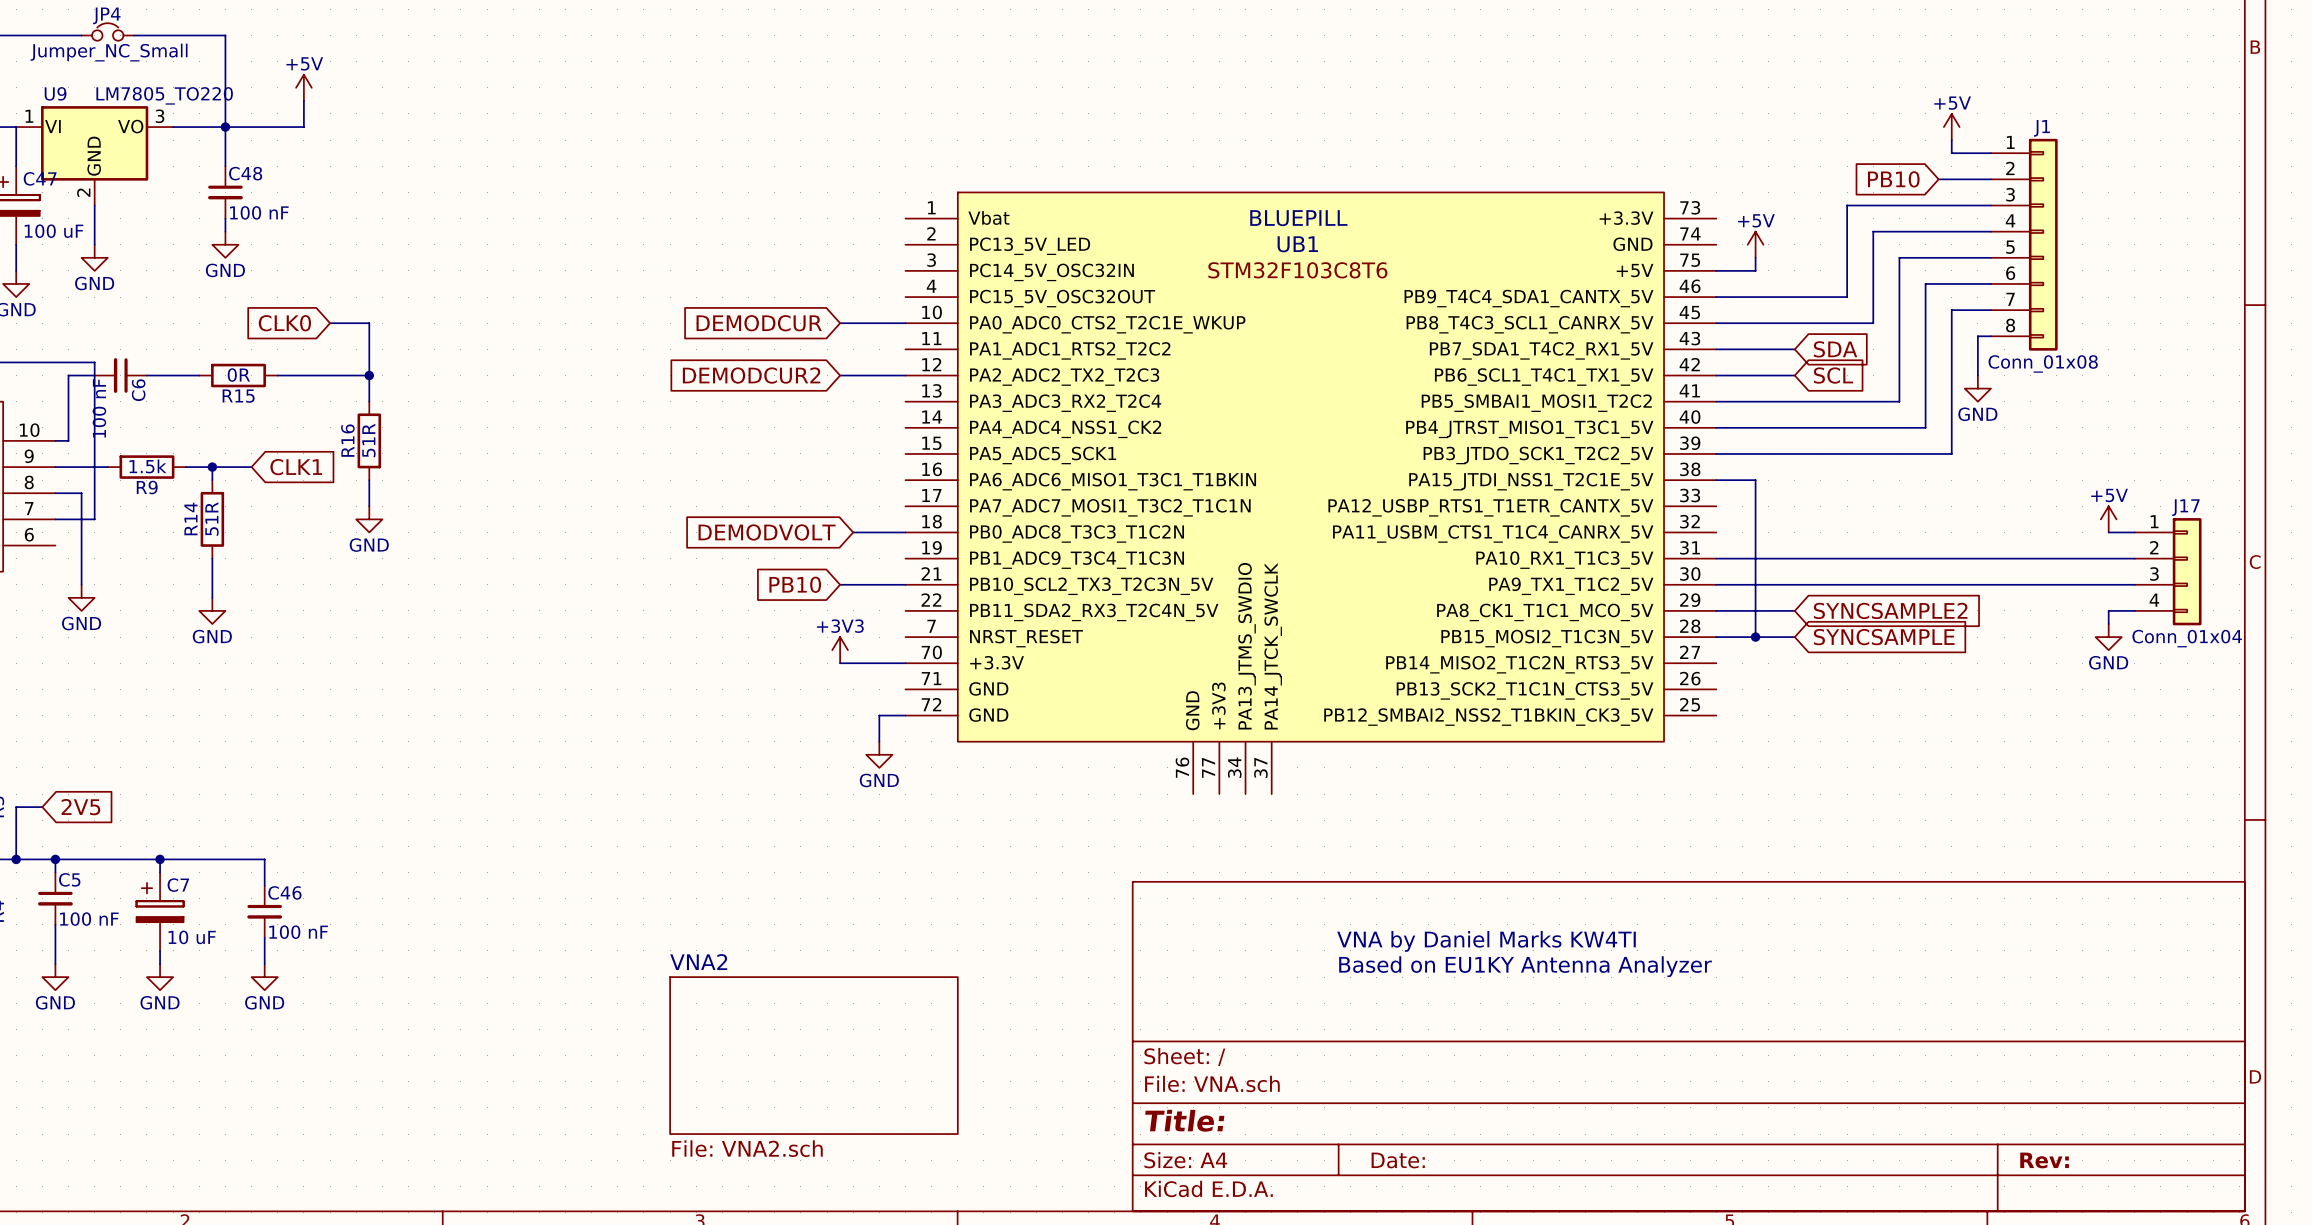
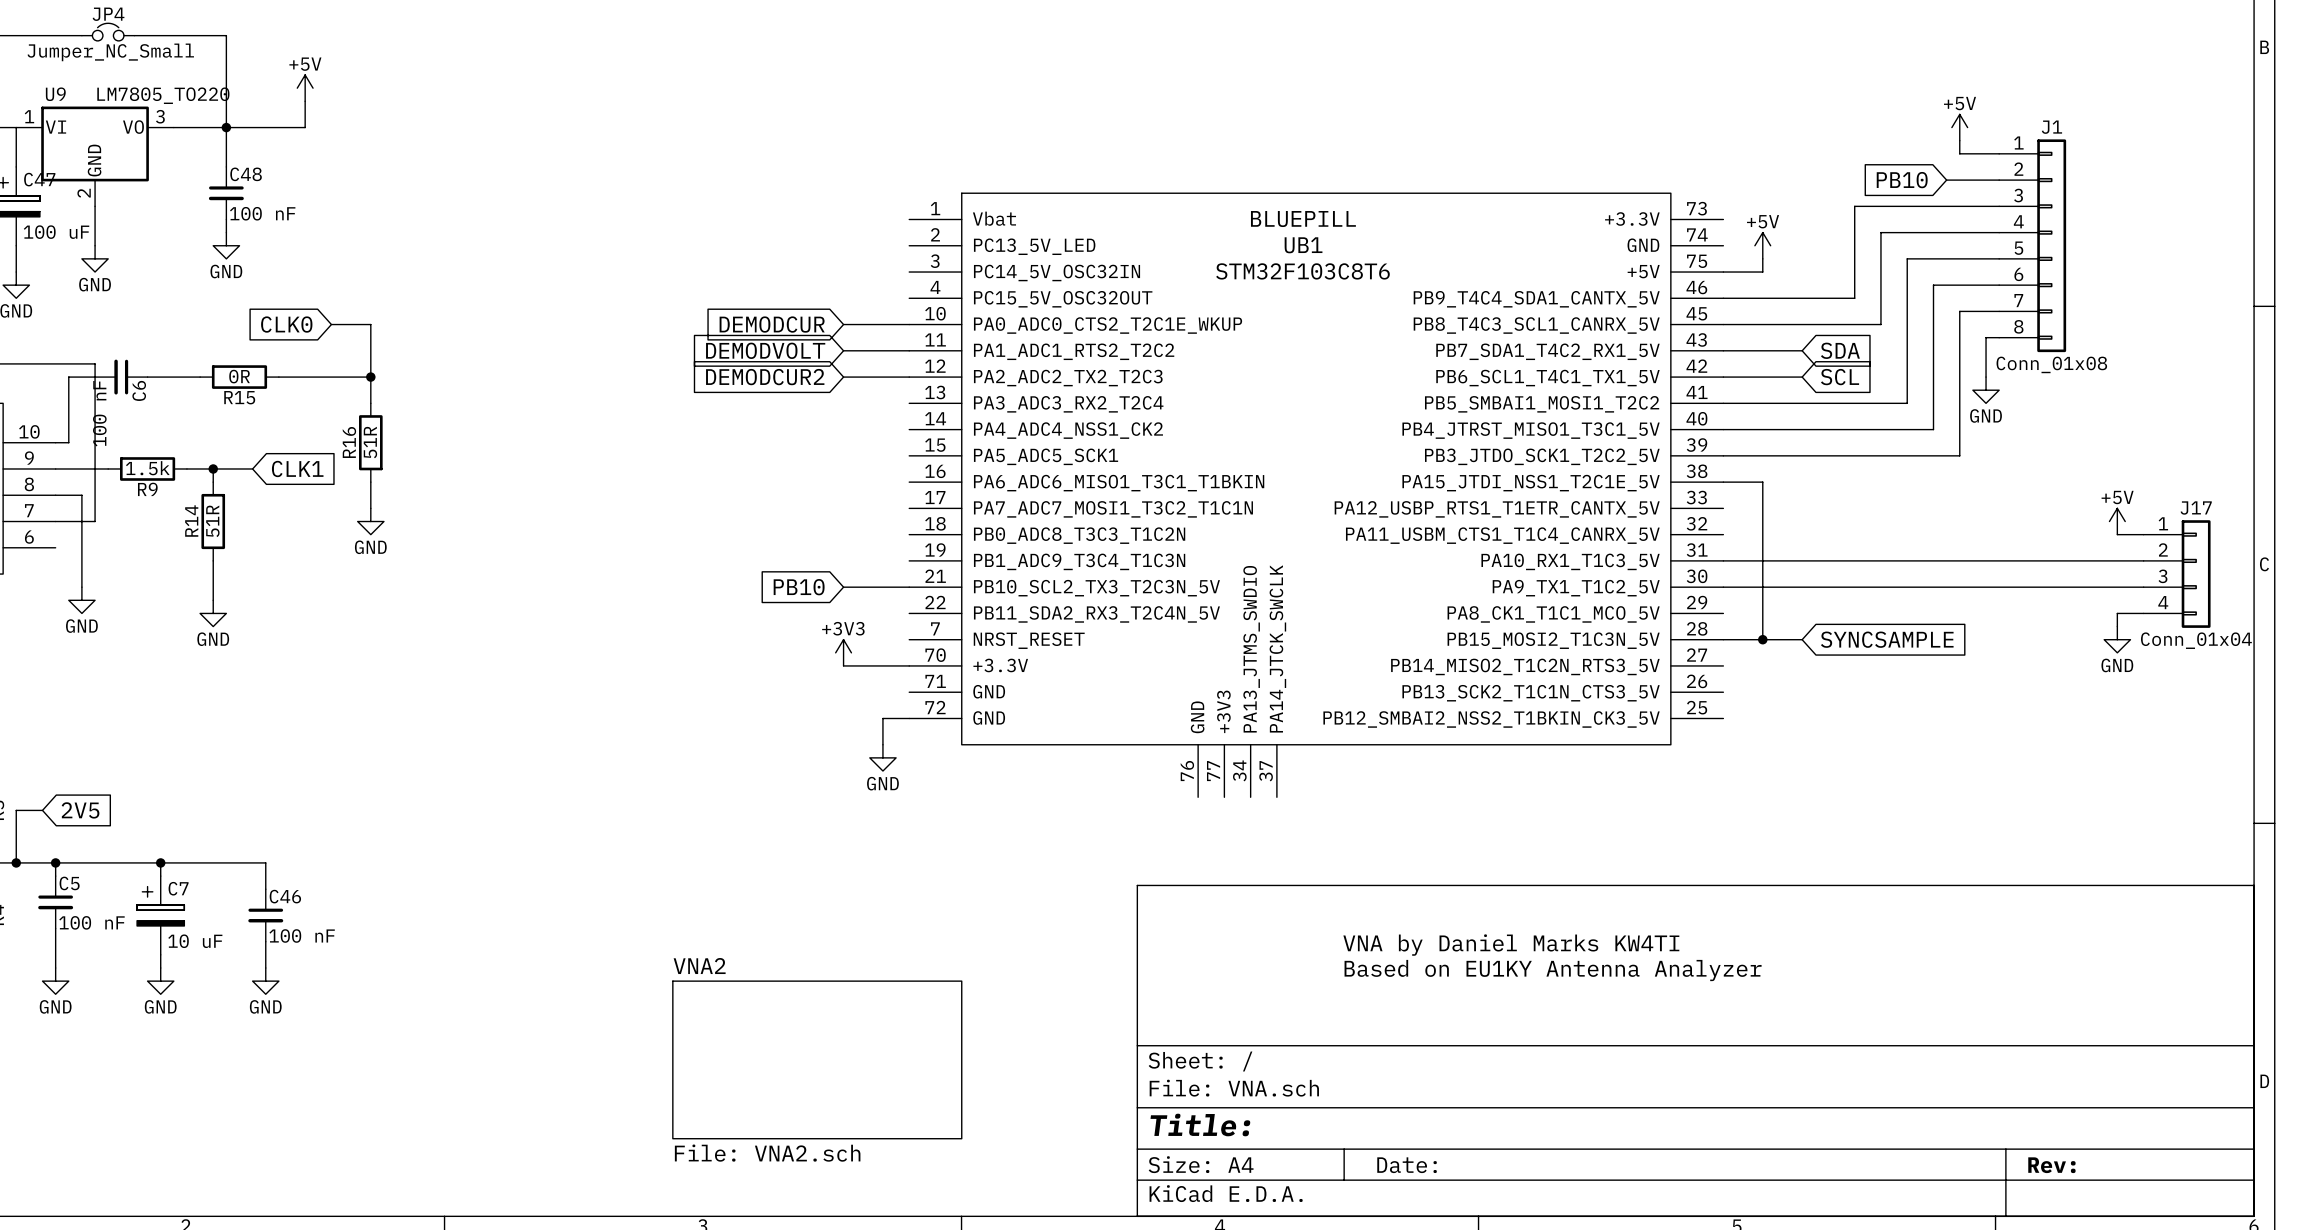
wire: none -> (843, 350) (909, 350)
global label position: DEMODVOLT (767, 532) -> DEMODVOLT (765, 350)
wire: (853, 532) (905, 532) -> none
wire: (1716, 610) (1794, 610) -> none
global label: SYNCSAMPLE2 (1890, 610) -> none

